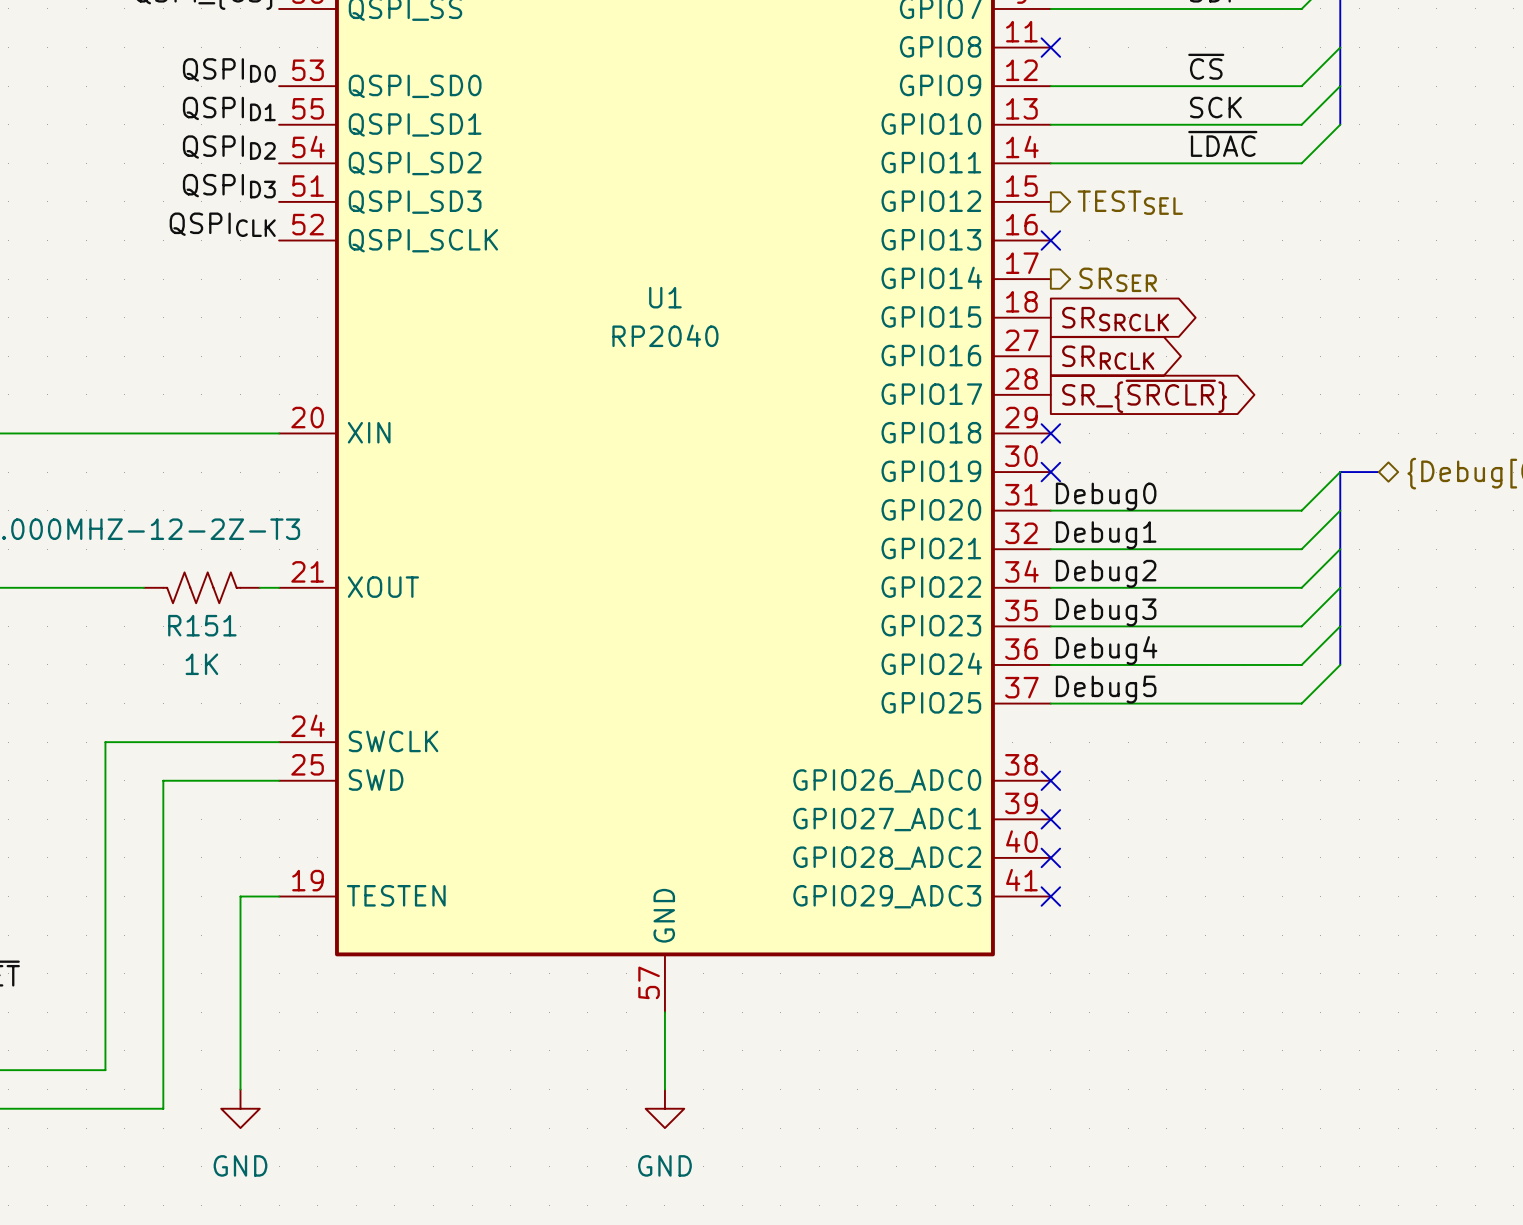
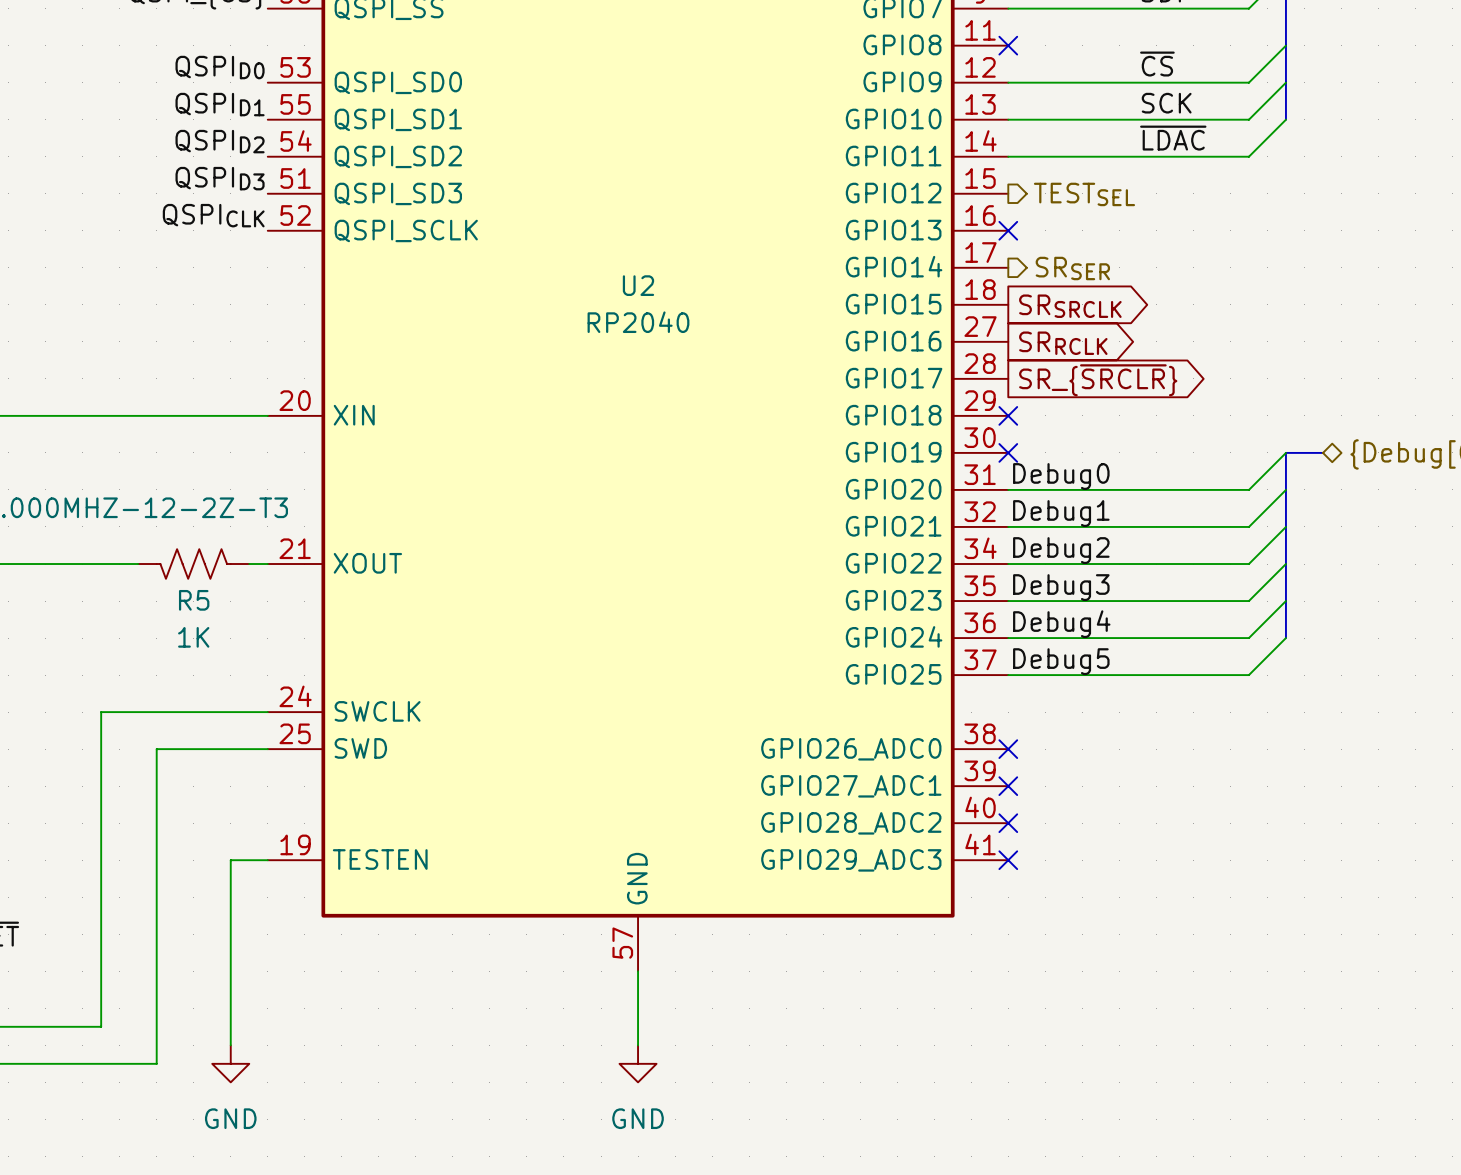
U1 name: U1 (665, 297) -> U2 (638, 285)
R151 name: R151 (202, 625) -> R5 (194, 600)

